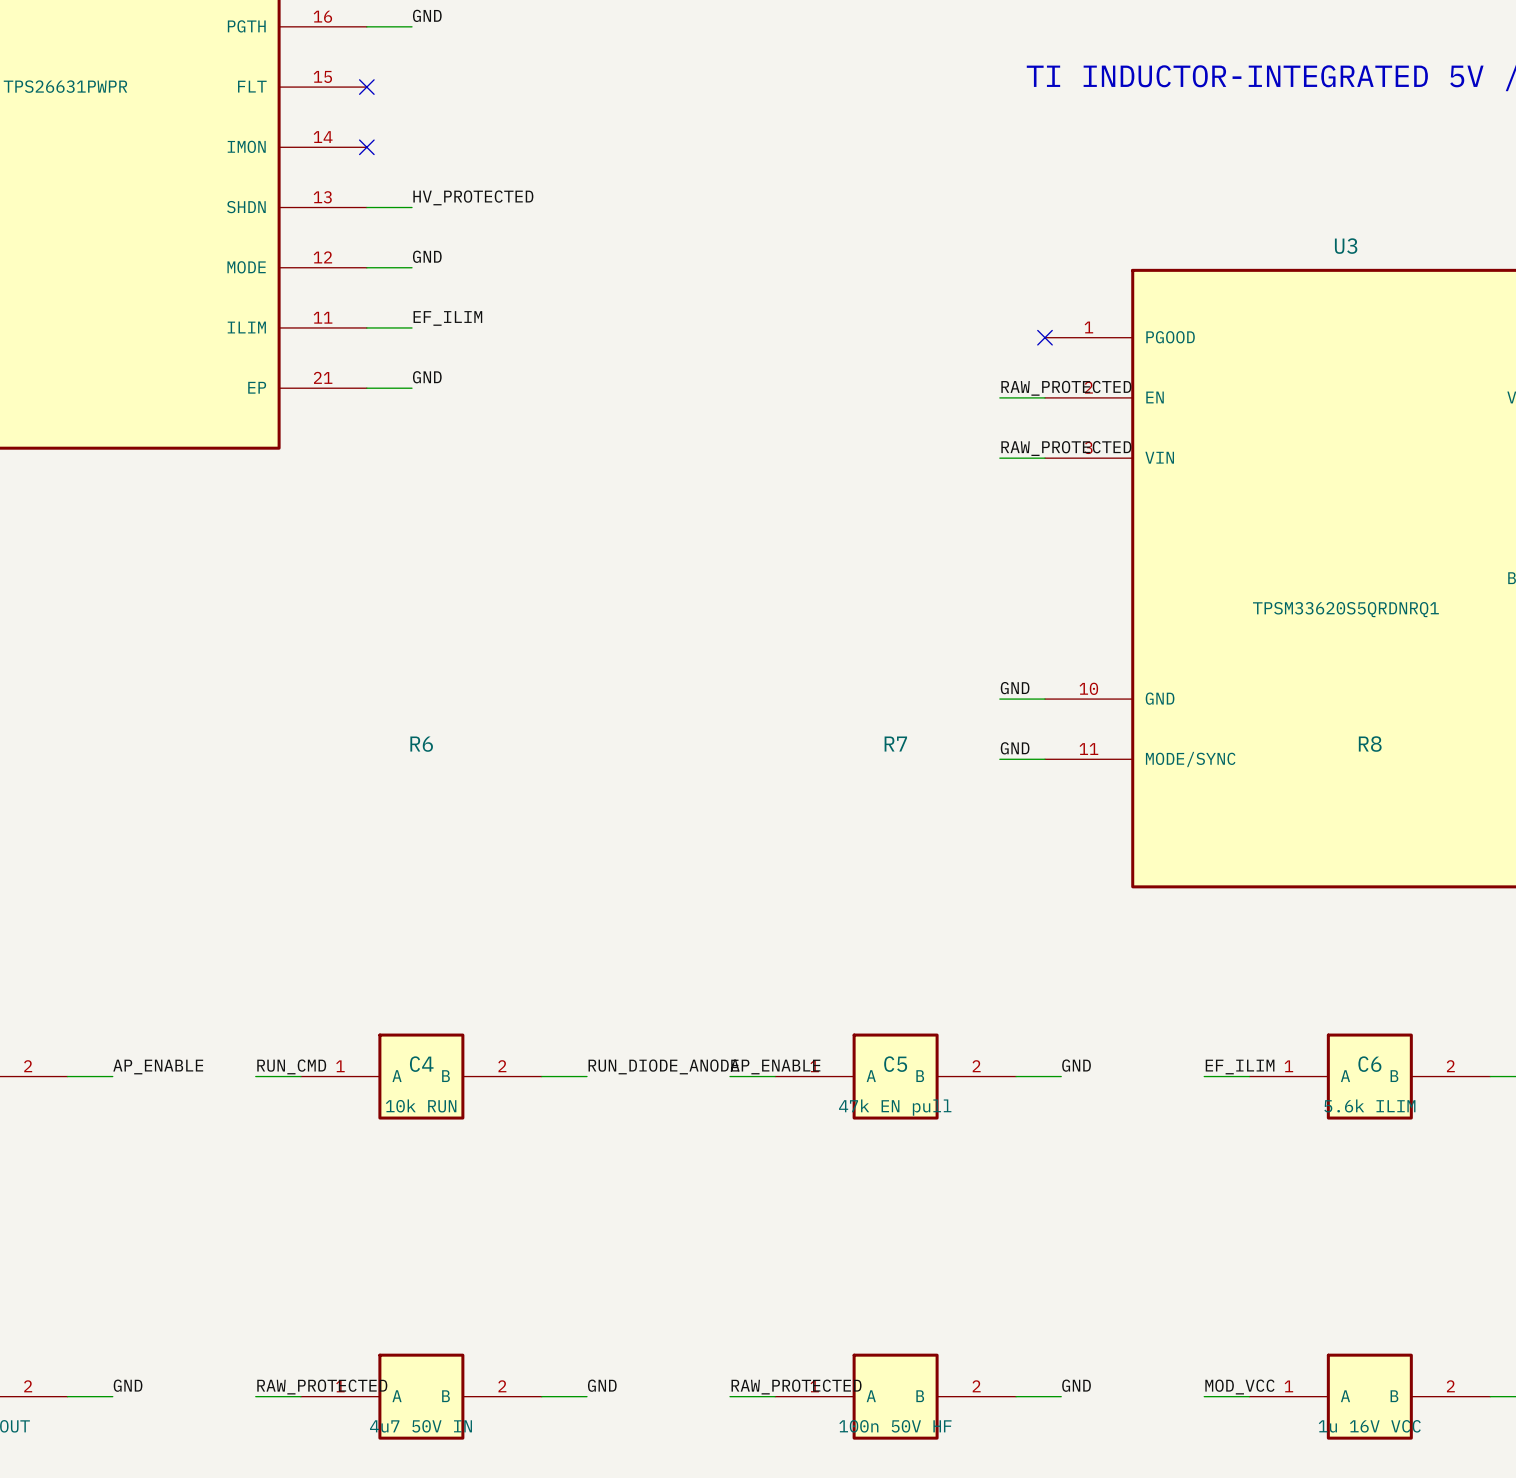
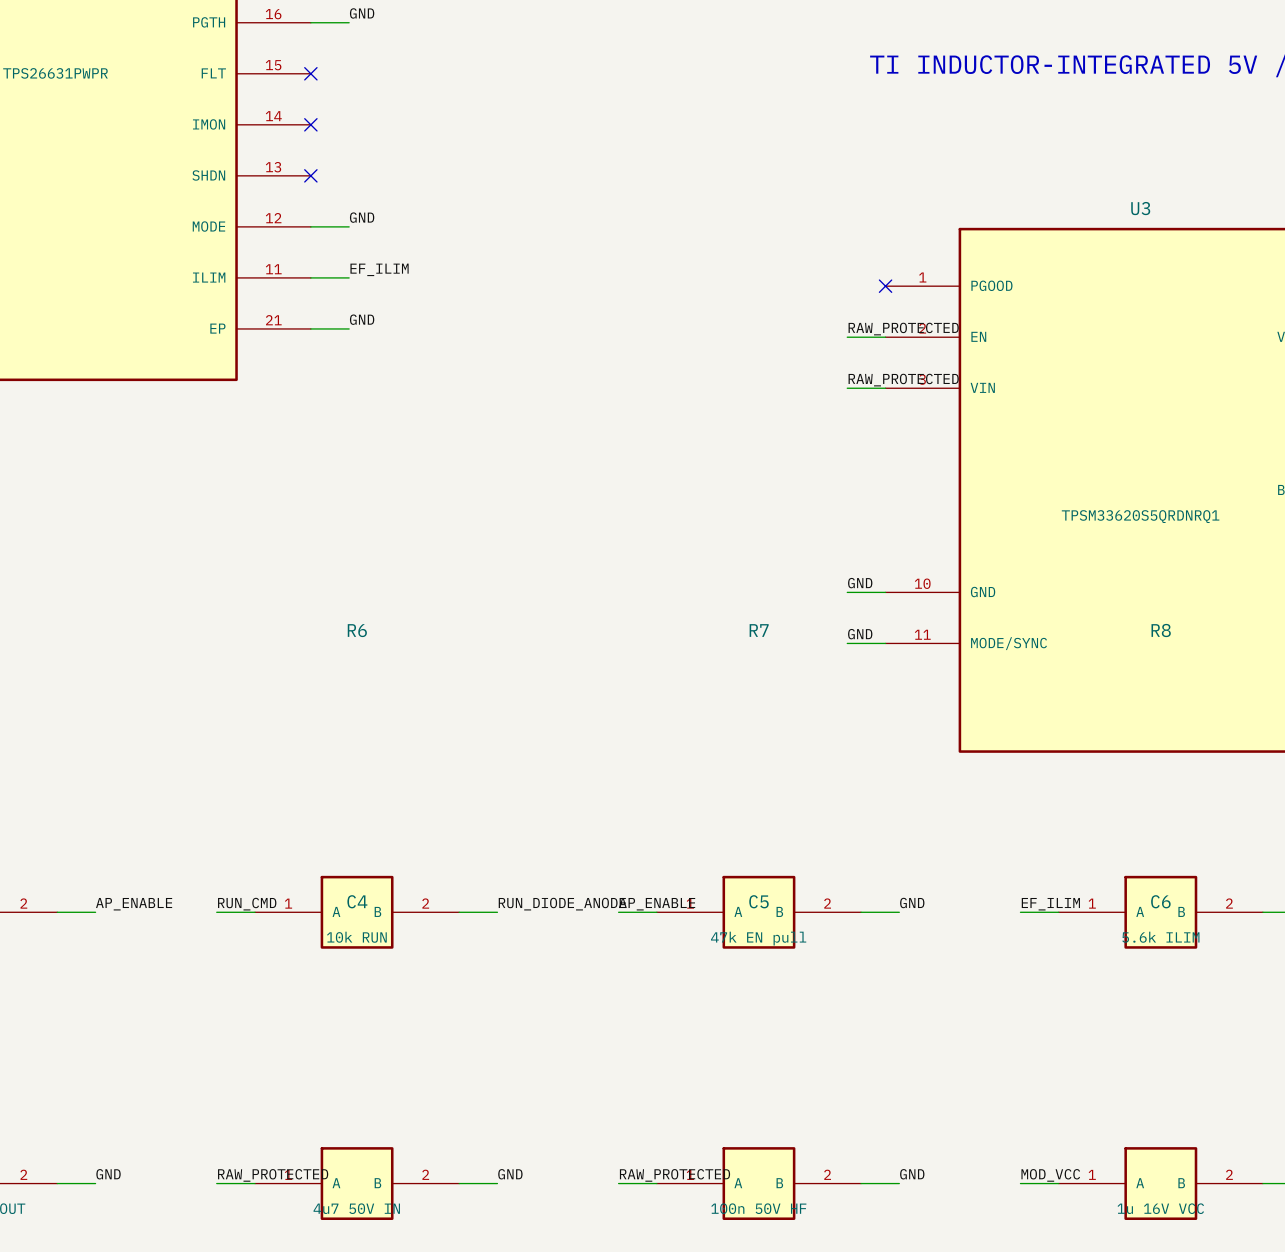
label: HV_PROTECTED (473, 197) -> none
wire: (366, 207) (412, 207) -> none
no-connect mark: none -> (310, 175)

